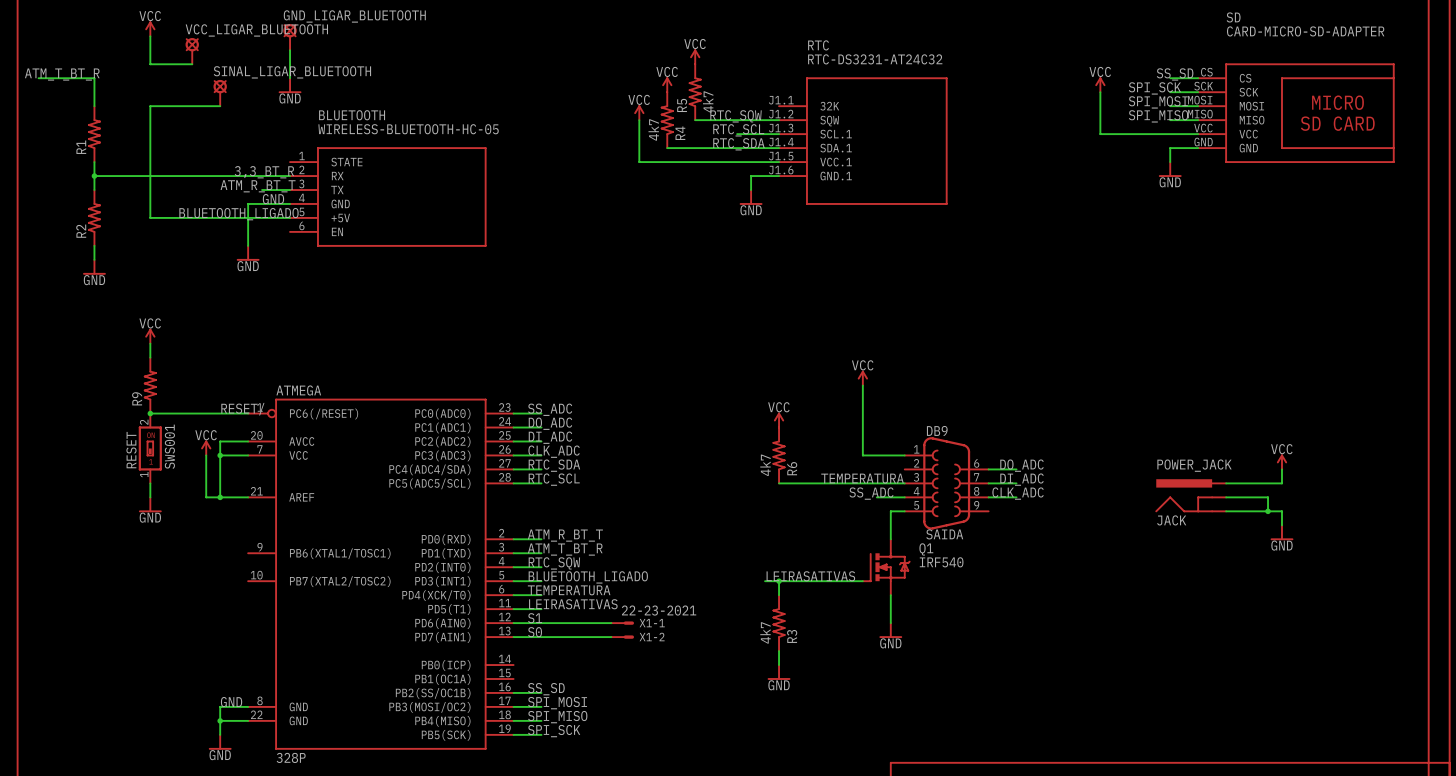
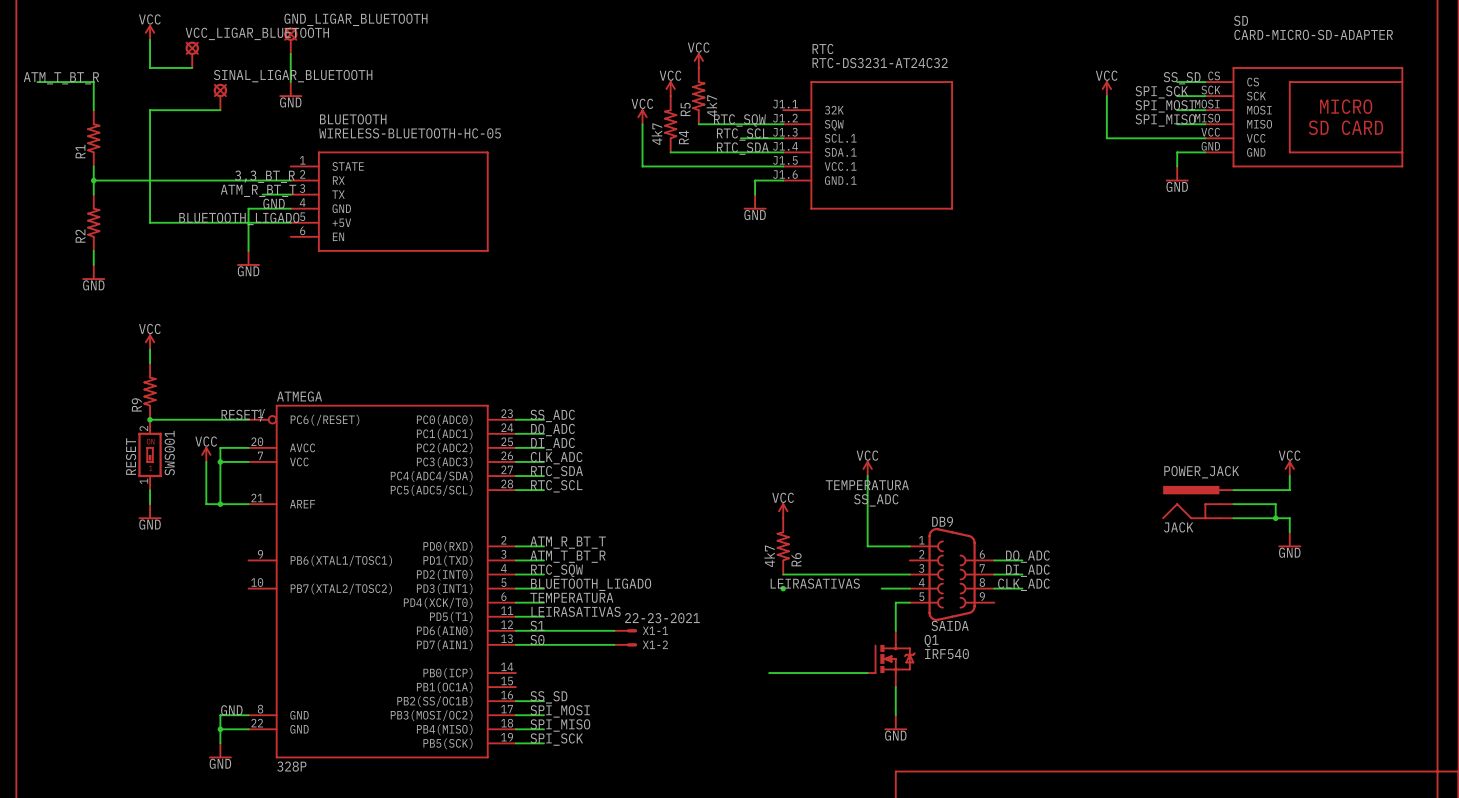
power symbol: VCC (862, 378) -> none
wire: (862, 385) (862, 455) (904, 455) -> (867, 476) (867, 546) (909, 546)
power symbol: VCC (779, 420) -> none
R6 position: (779, 455) -> (783, 546)
power symbol: none -> VCC (867, 468)
label position: DO_ADC (1021, 465) -> DO_ADC (1027, 556)
wire: (988, 469) (1016, 469) -> (994, 560) (1022, 560)
label position: DI_ADC (1021, 479) -> DI_ADC (1027, 570)
wire: (779, 483) (904, 483) -> (783, 574) (909, 574)
DB9 position: (946, 483) -> (952, 574)
wire: (988, 483) (1016, 483) -> (994, 574) (1022, 574)
label position: CLK_ADC (1018, 493) -> CLK_ADC (1023, 584)
wire: (876, 497) (904, 497) -> (881, 588) (909, 588)
wire: (988, 497) (1016, 497) -> (994, 588) (1022, 588)
power symbol: none -> VCC (783, 510)
wire: (904, 511) (890, 511) (890, 539) -> none
Q1 position: (886, 567) -> (891, 658)
wire: (765, 581) (862, 581) -> (769, 673) (867, 673)
wire: (779, 581) (779, 595) -> none
wire: none -> (895, 602) (909, 602)
R3: 4k7 (779, 623) -> none
power symbol: GND (890, 630) -> none
wire: (779, 651) (779, 665) -> none
power symbol: GND (779, 672) -> none
wire: none -> (895, 687) (895, 715)
power symbol: none -> GND (895, 722)

